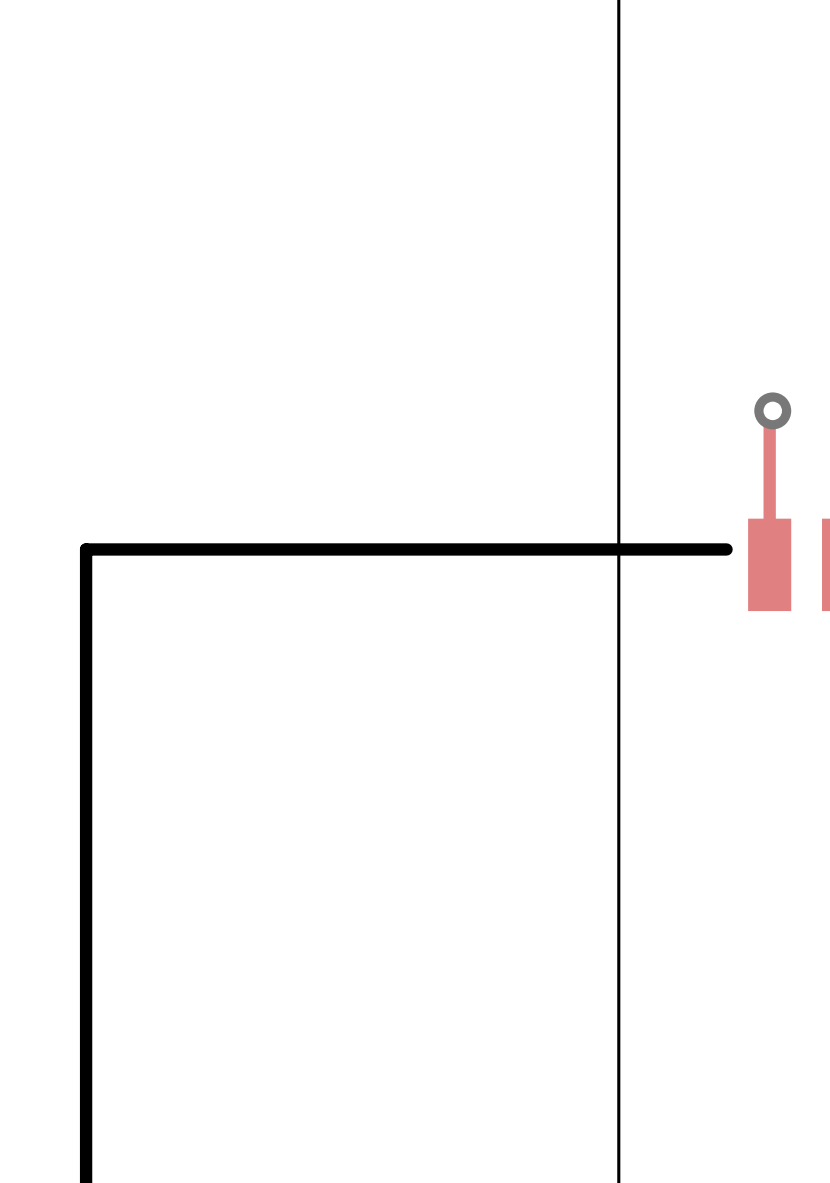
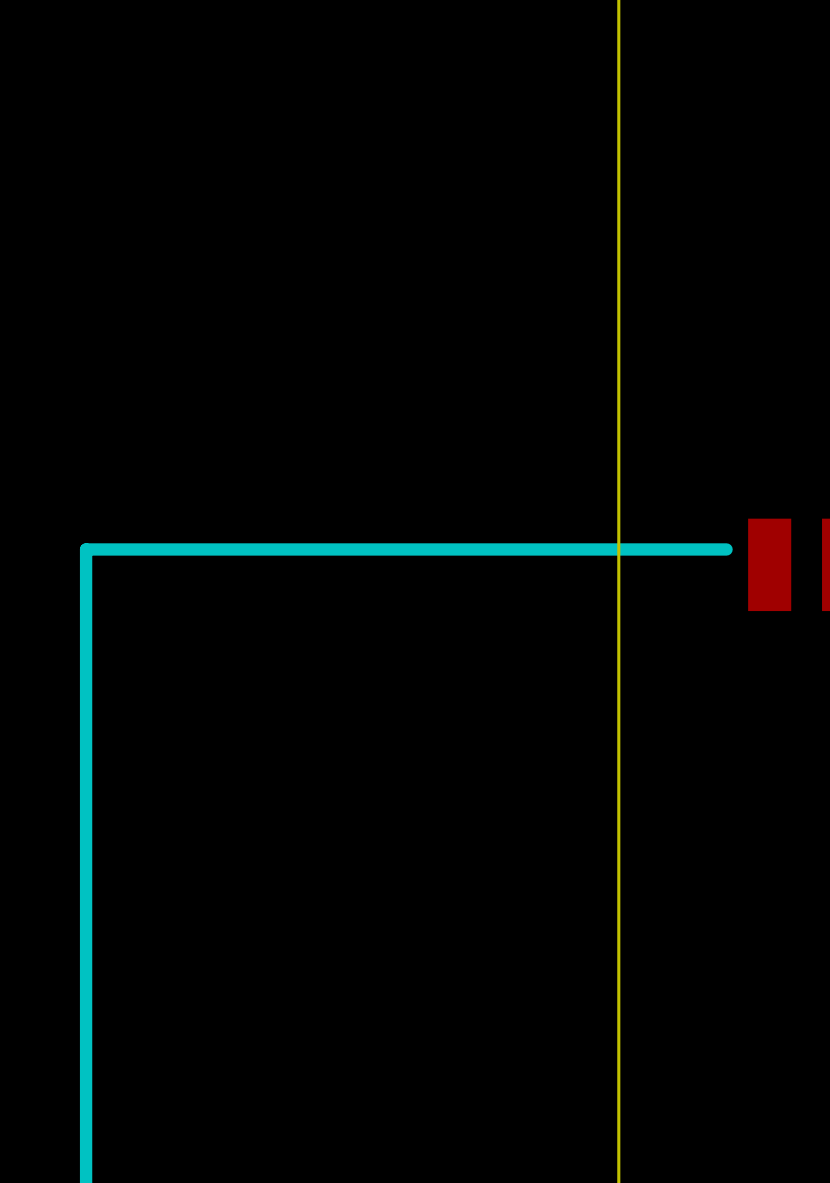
track: (772, 410) (769, 413) (769, 564) -> none
via: (772, 410) -> none

